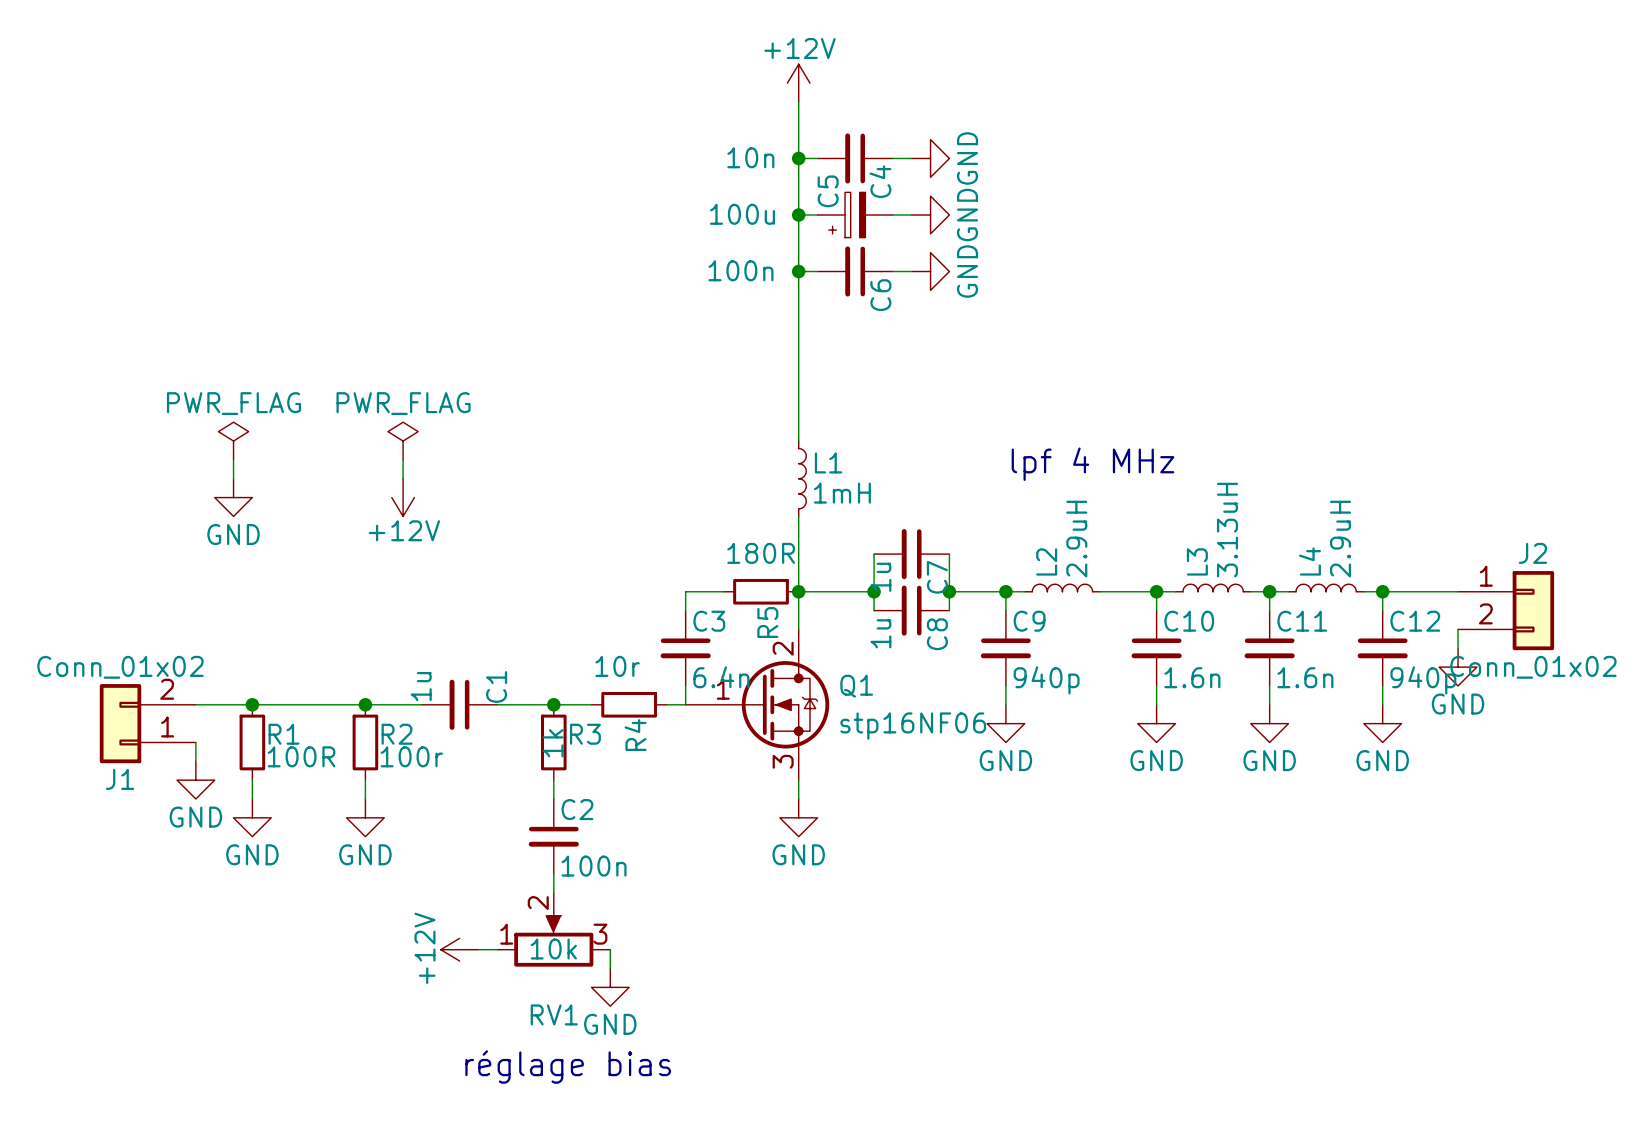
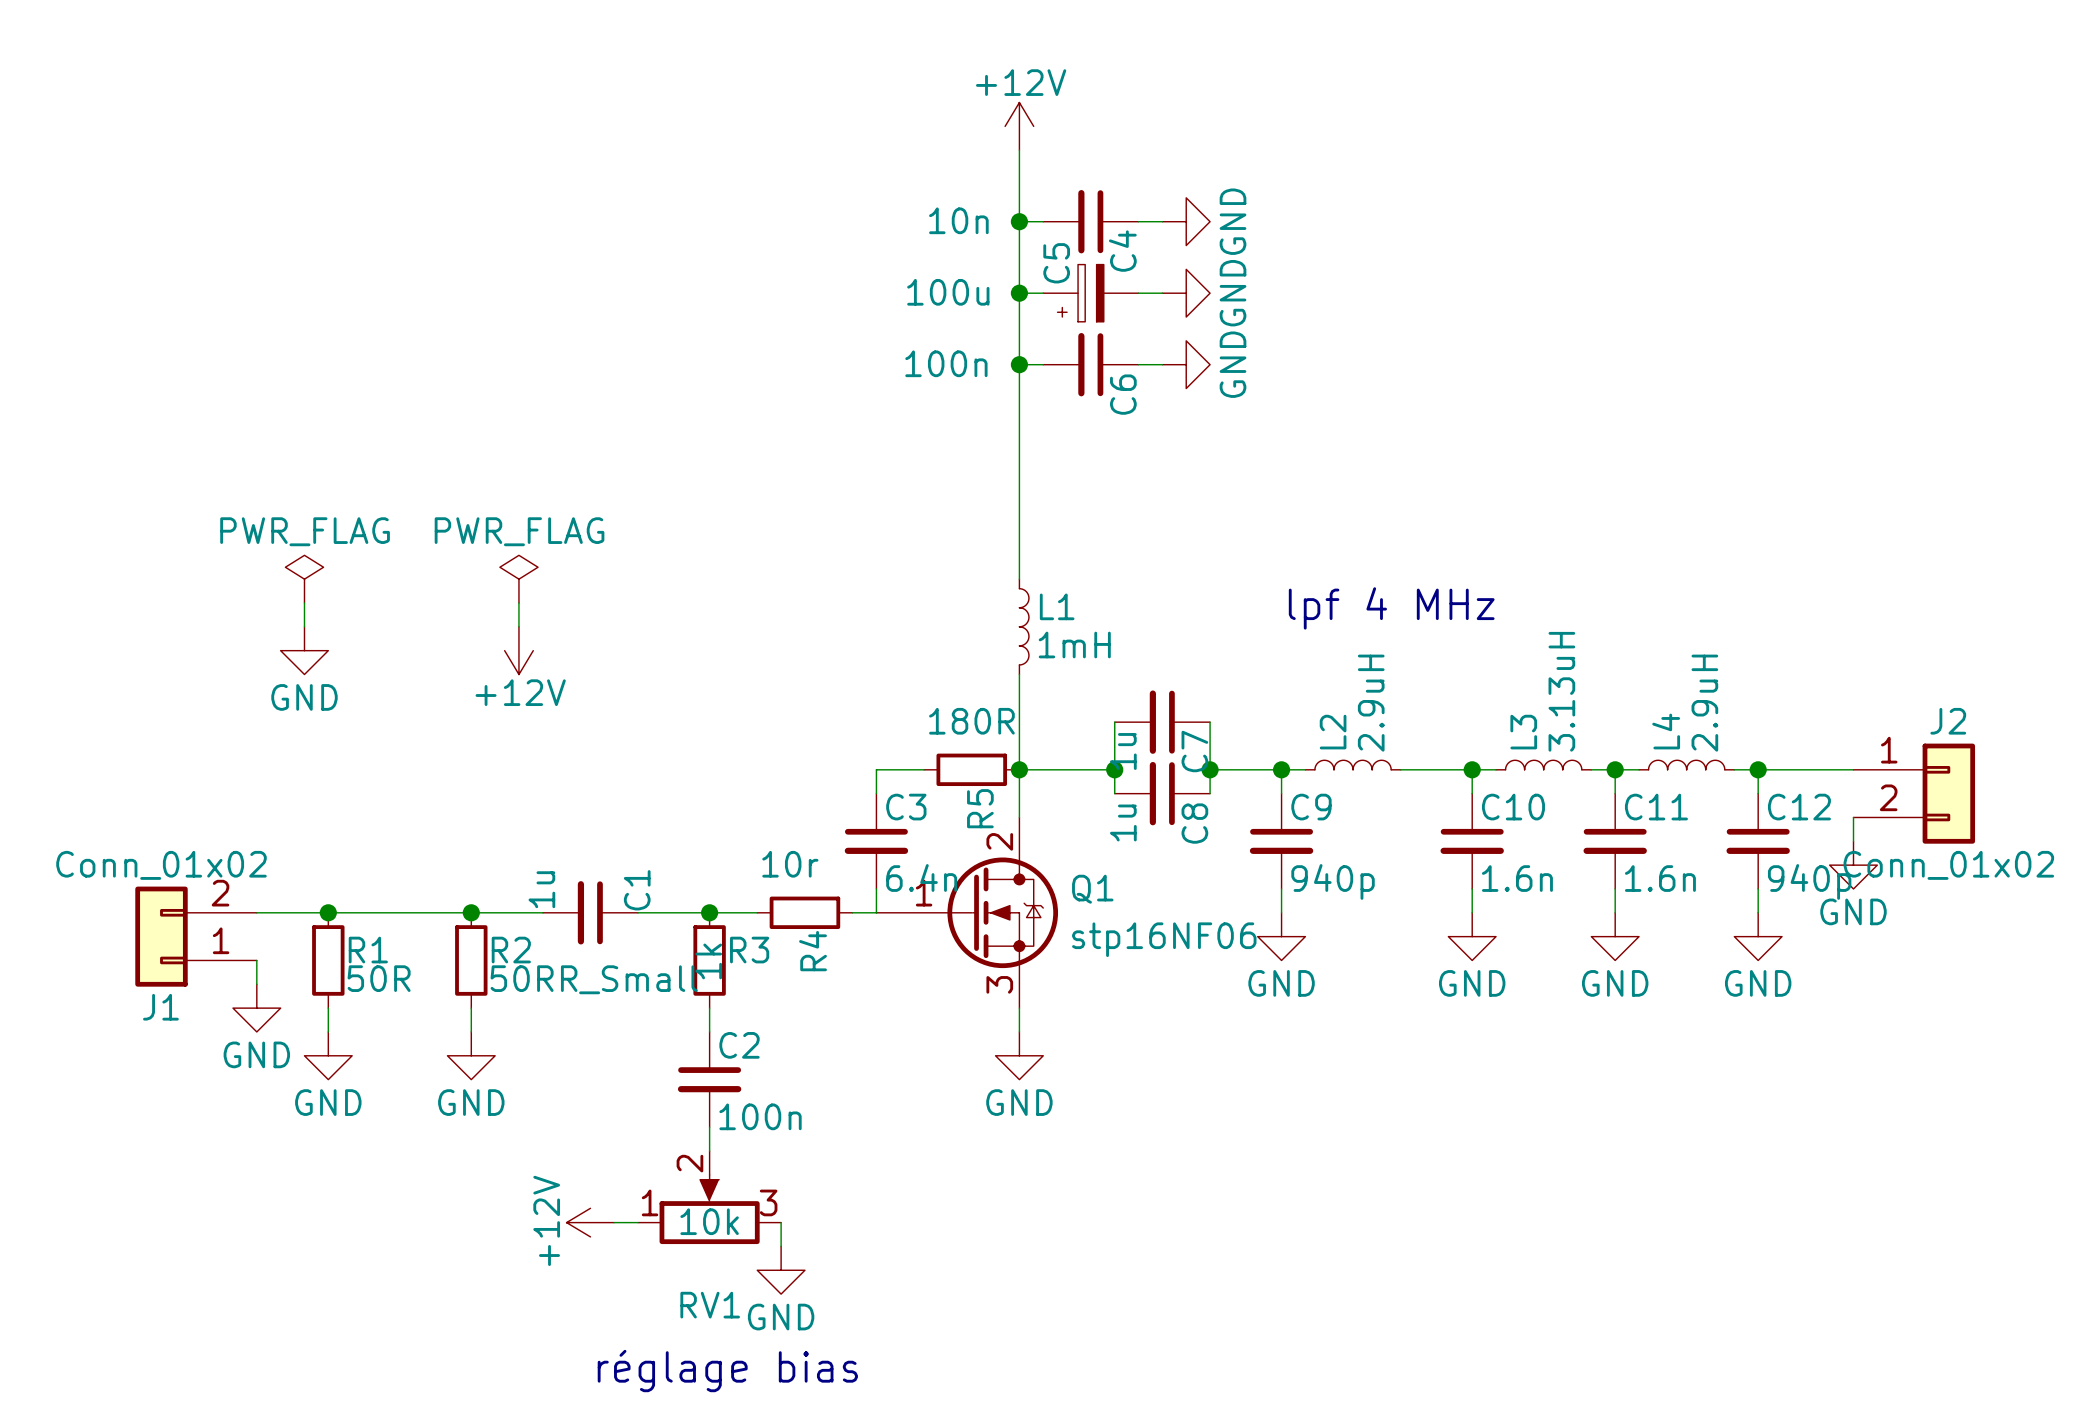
R1 value: 100R (301, 756) -> 50R (379, 978)
R2 value: 100r (411, 756) -> 50RR_Small (594, 979)

